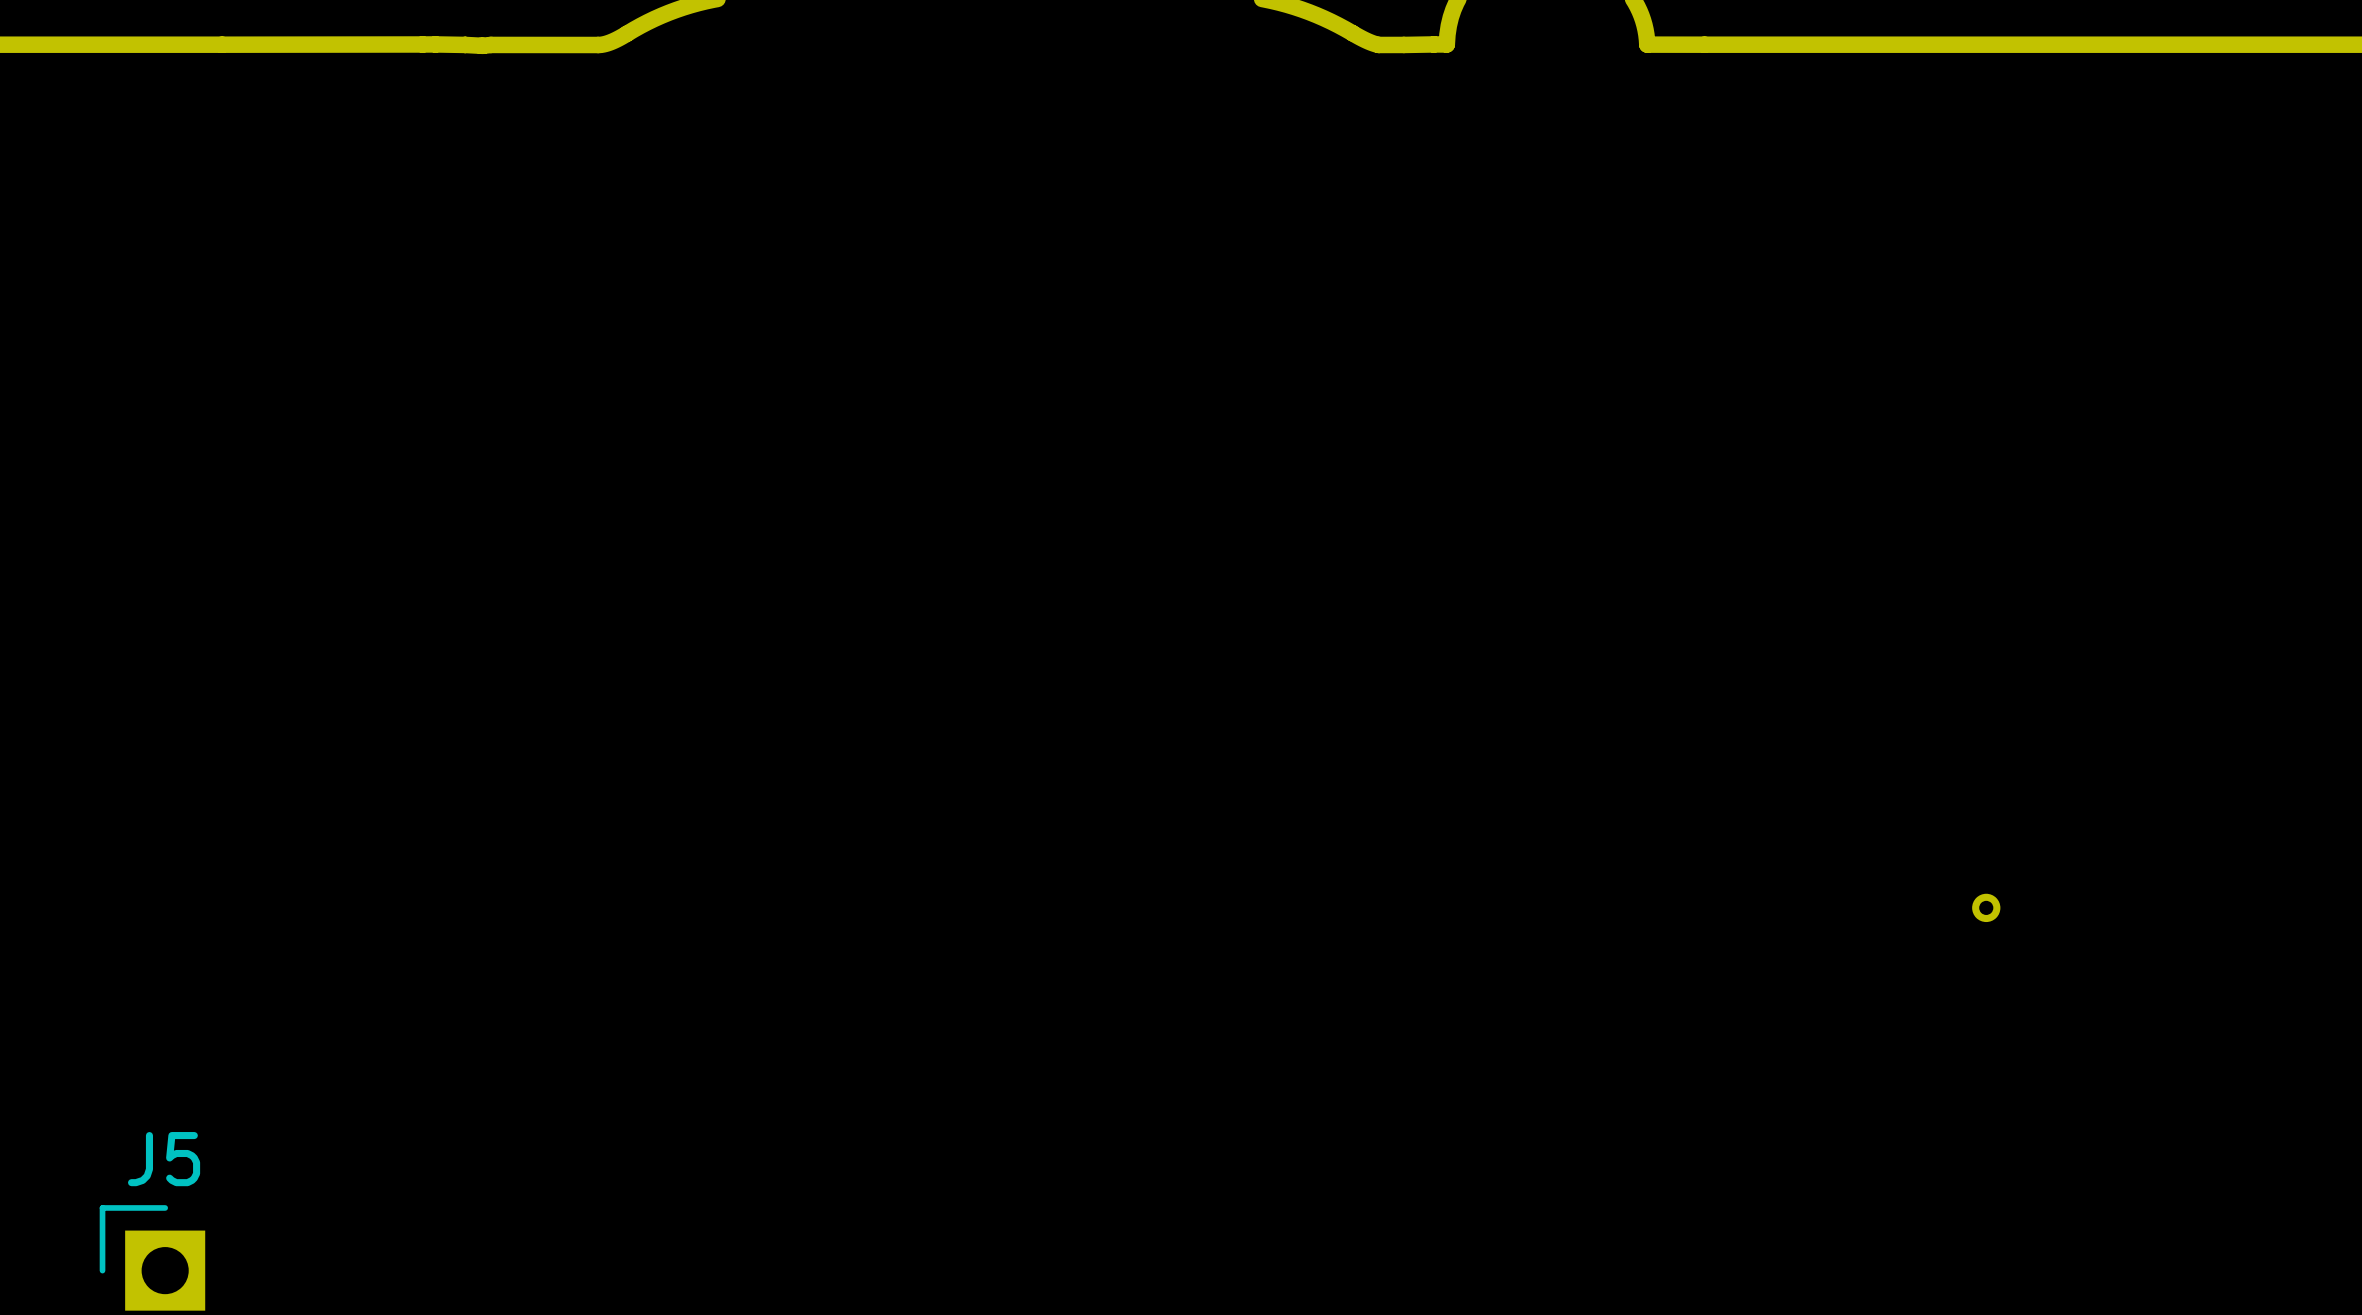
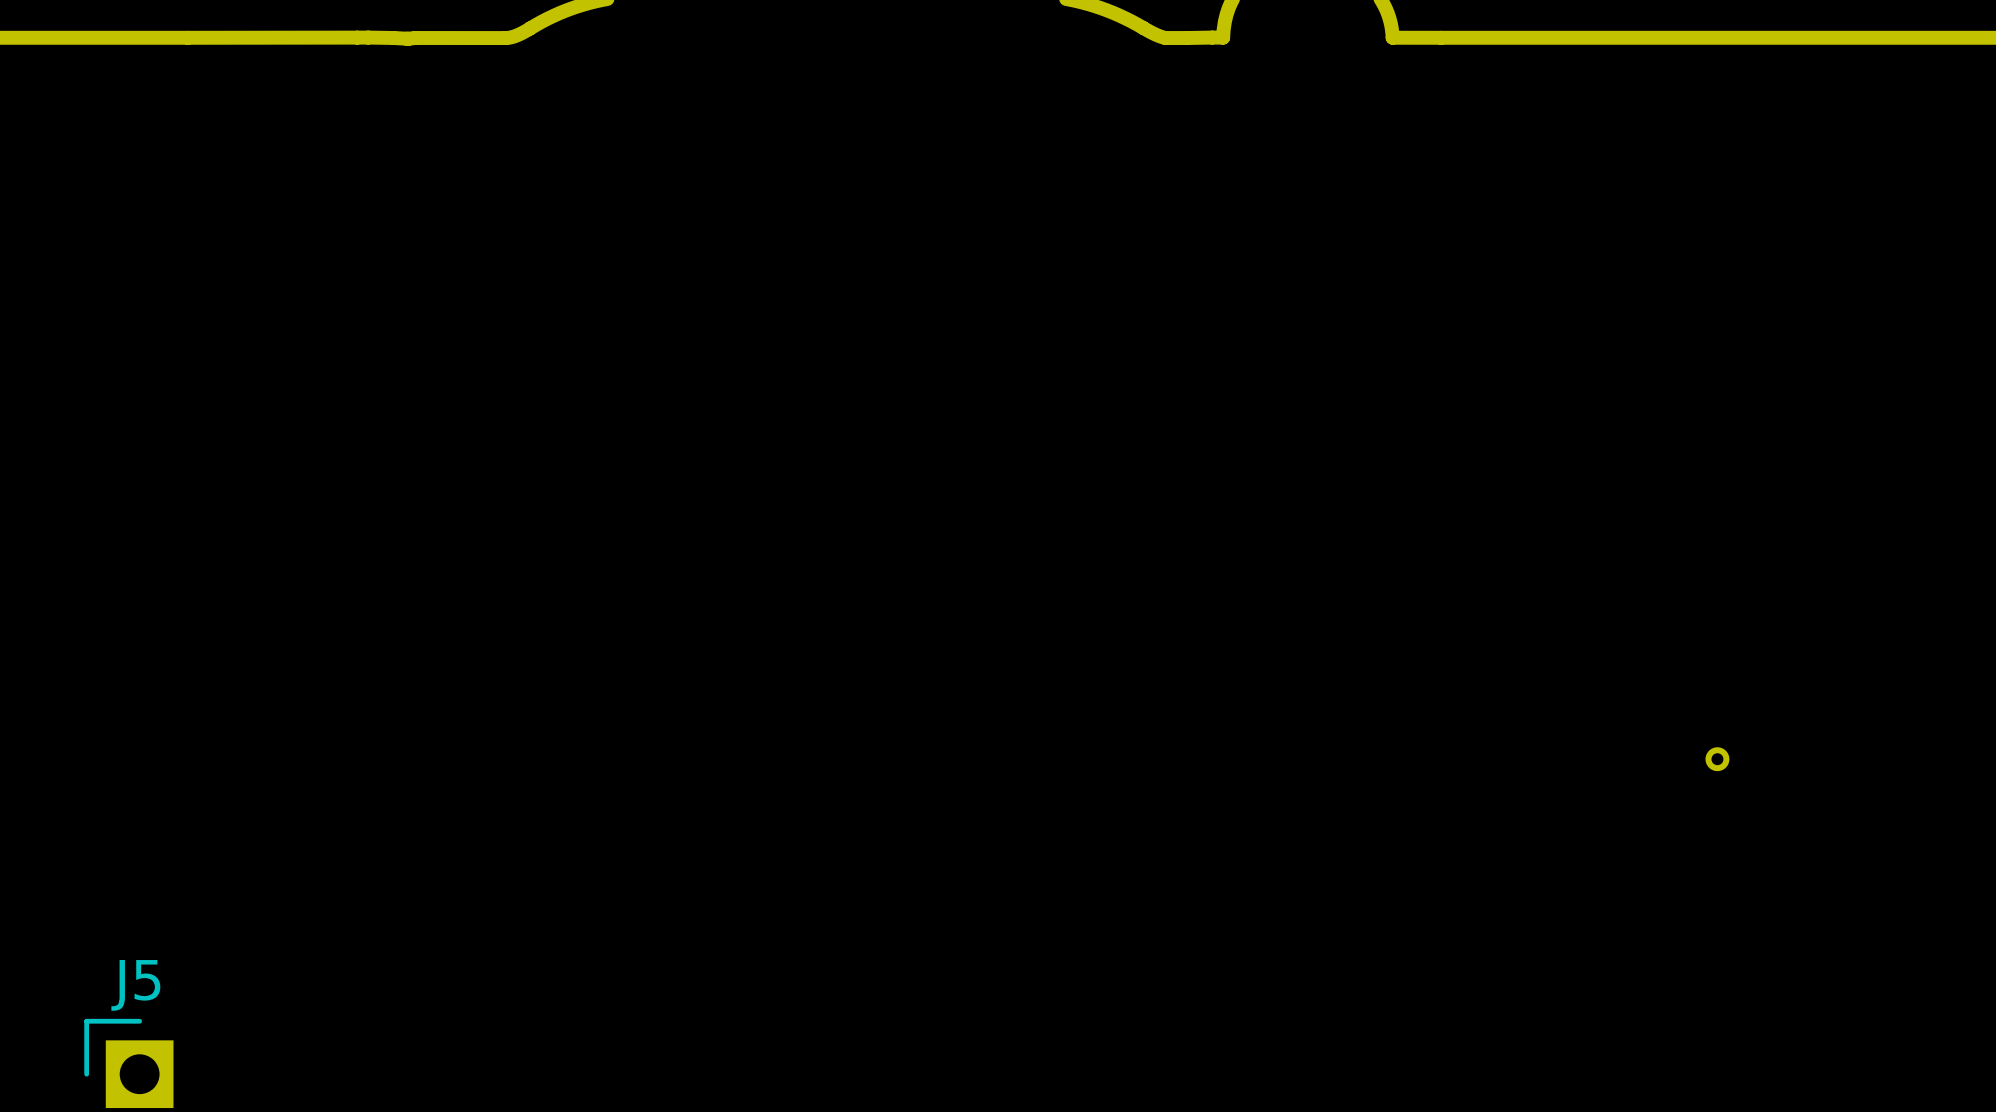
part position: (1986, 907) -> (1717, 759)

